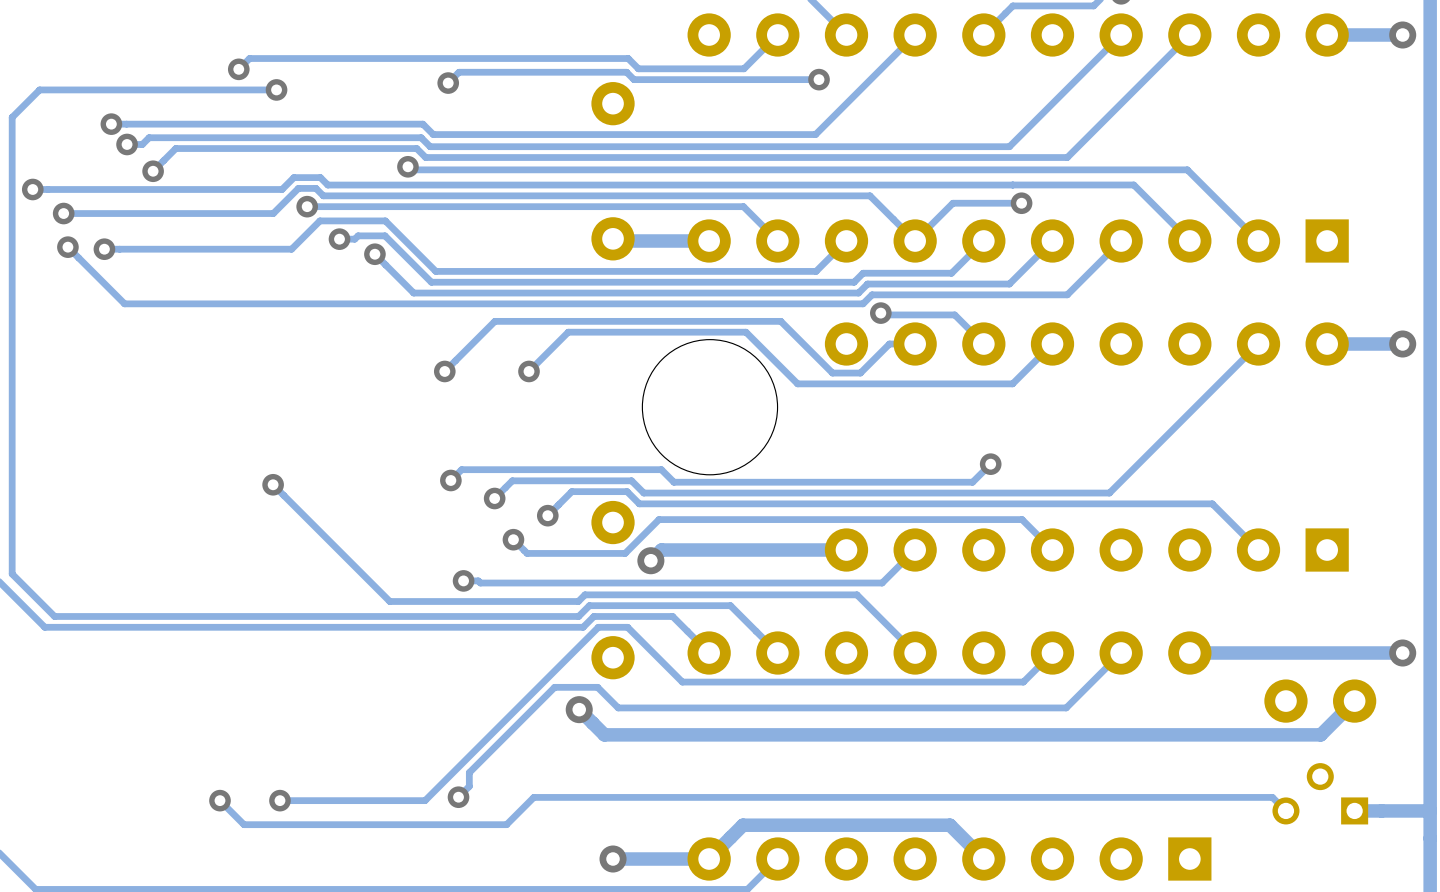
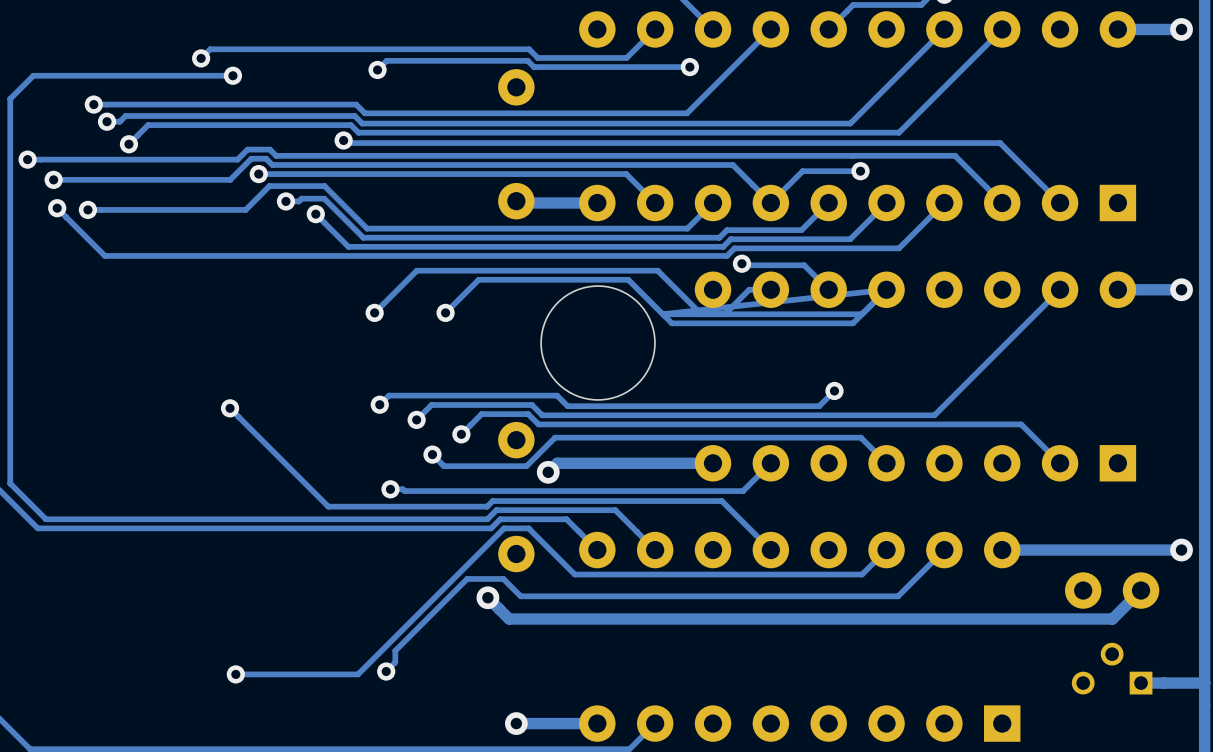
track: none -> (886, 289) (662, 314) (701, 314)
track: none -> (862, 314) (724, 314)
track: (219, 800) (244, 824) (506, 824) (533, 797) (1272, 797) (1285, 810) -> none
via: (219, 800) -> none
track: (983, 859) (950, 825) (742, 825) (709, 859) -> none

